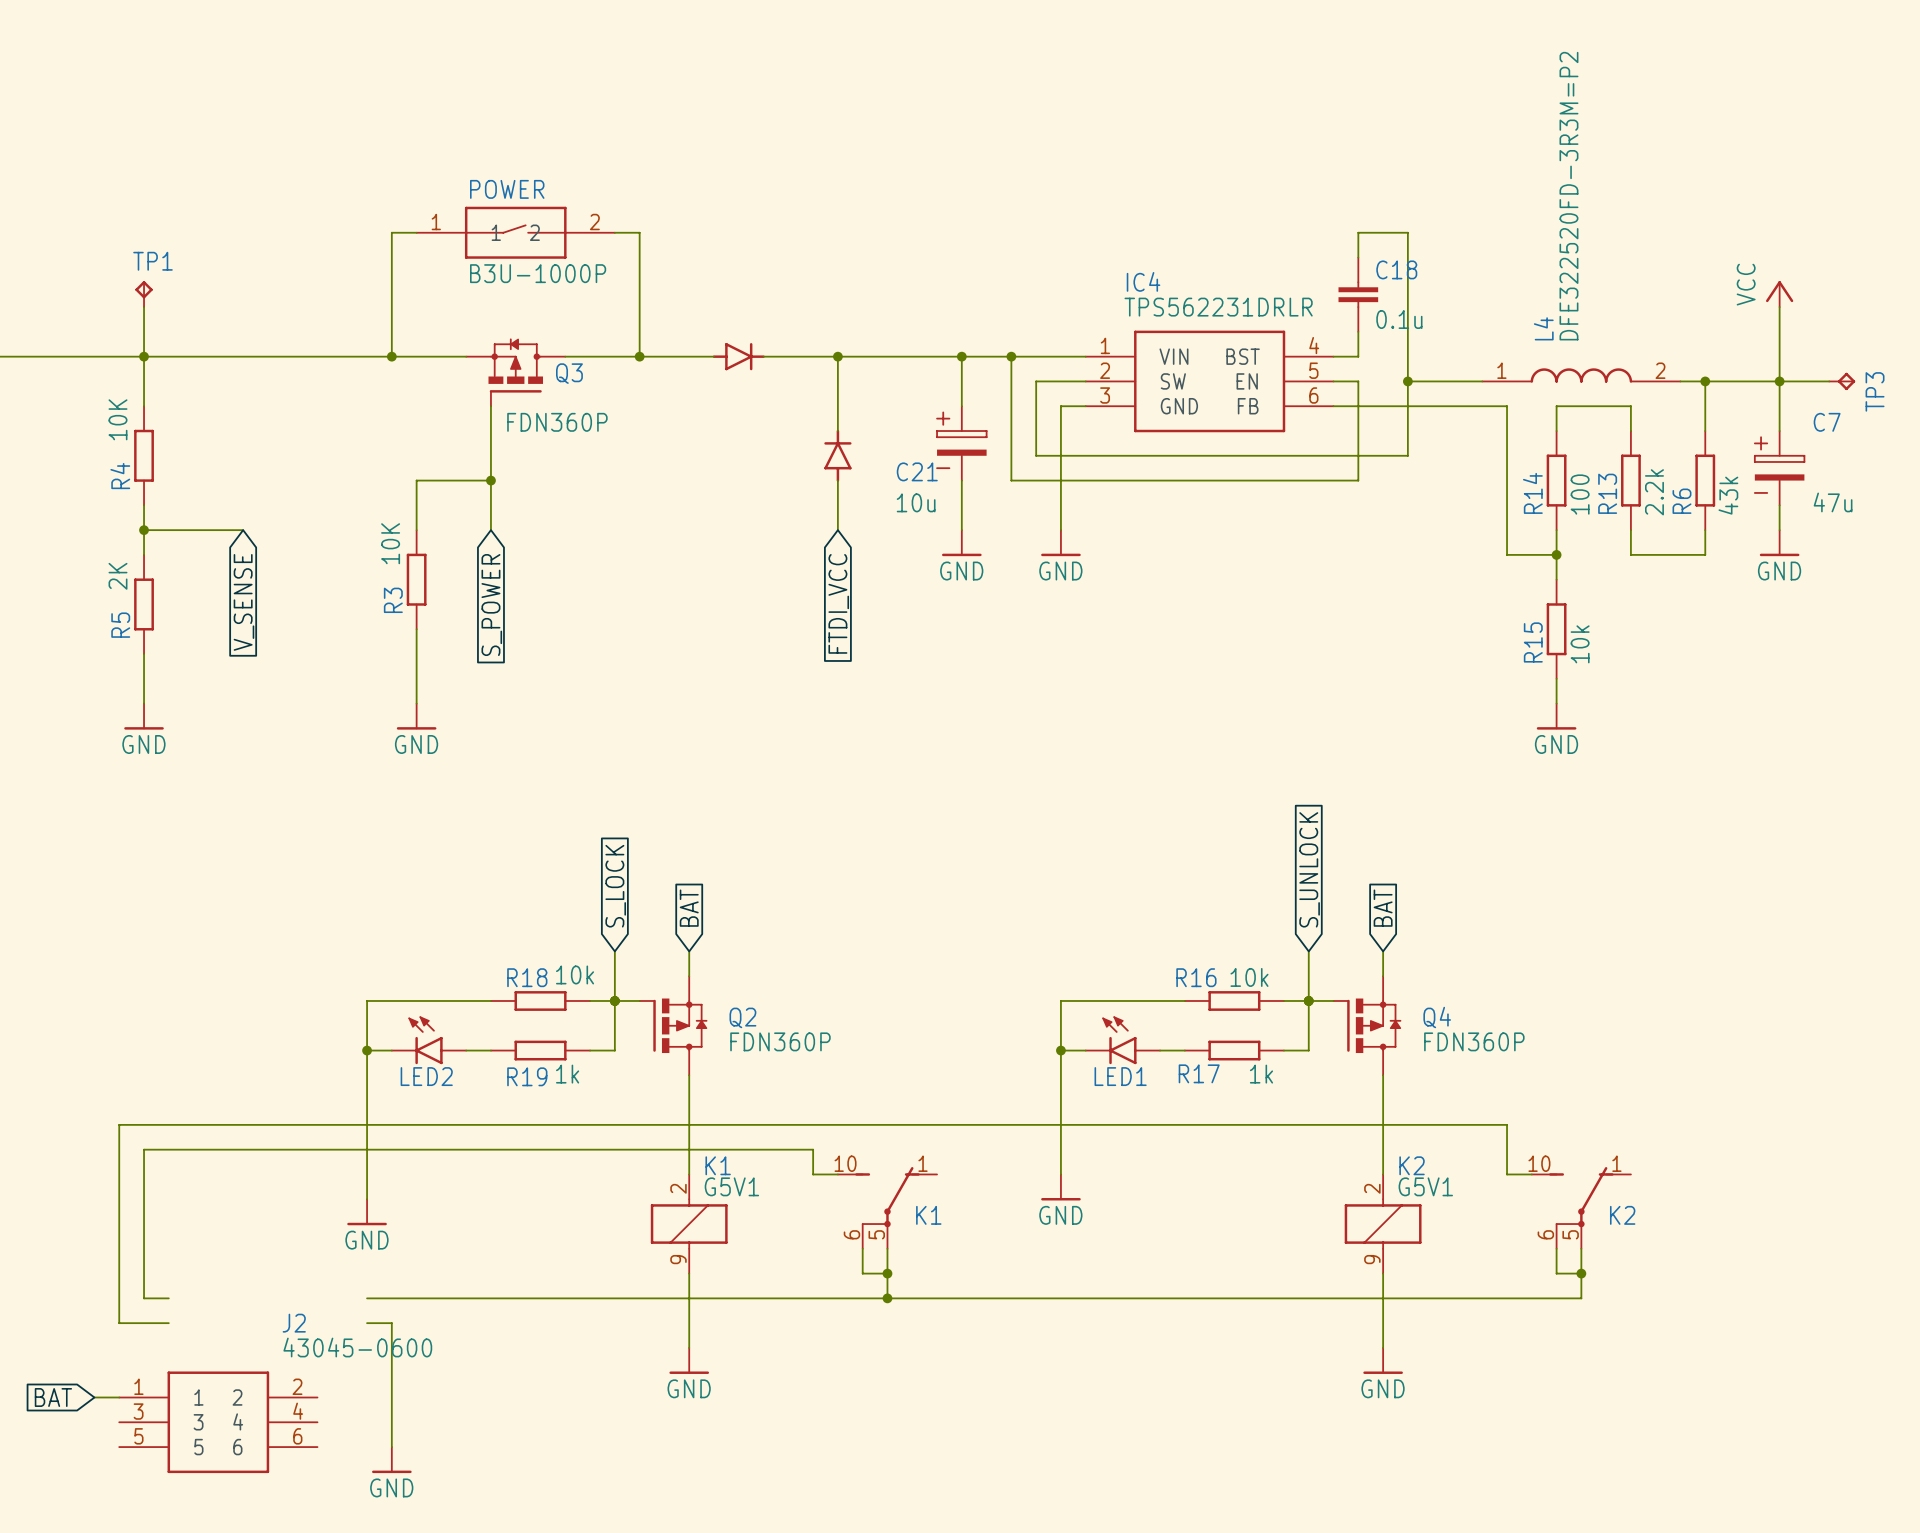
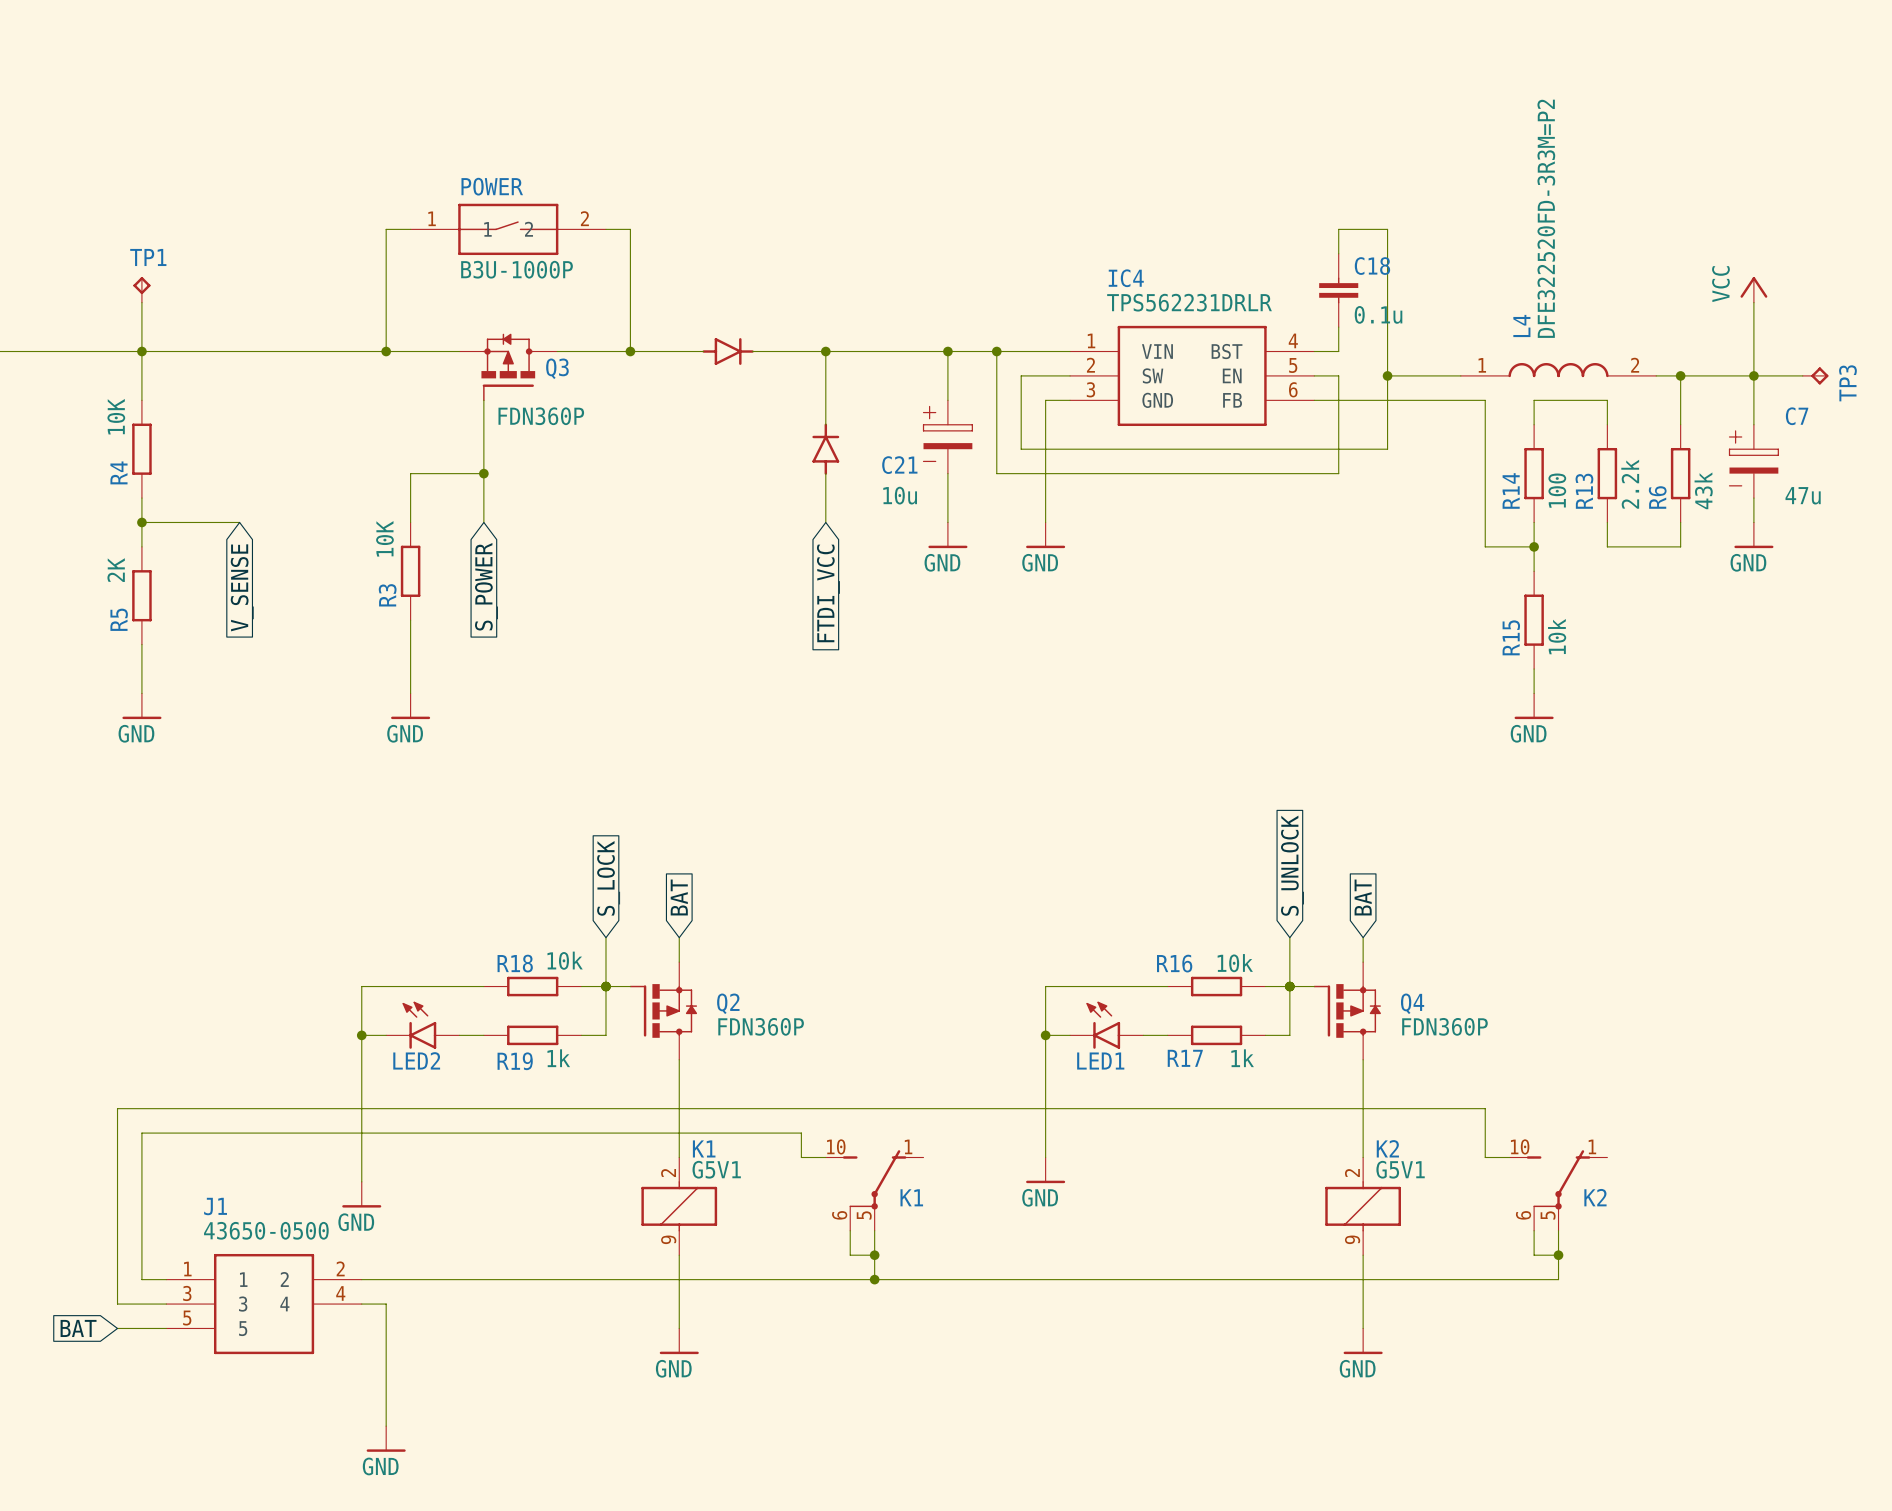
J1: none -> 43650-0500 (264, 1304)
wire: none -> (117, 1328) (166, 1328)
global label position: BAT (53, 1397) -> BAT (78, 1328)
wire: (94, 1397) (119, 1397) -> none
J2: 43045-0600 (218, 1422) -> none

